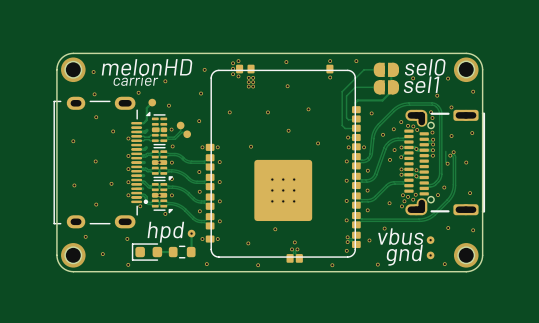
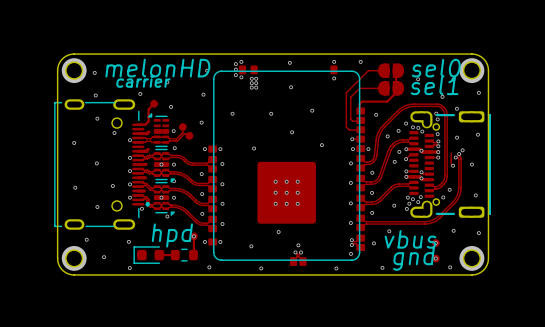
part footprint: [53, 96, 149, 229] -> [54, 99, 150, 230]
via: none -> (462, 150)

